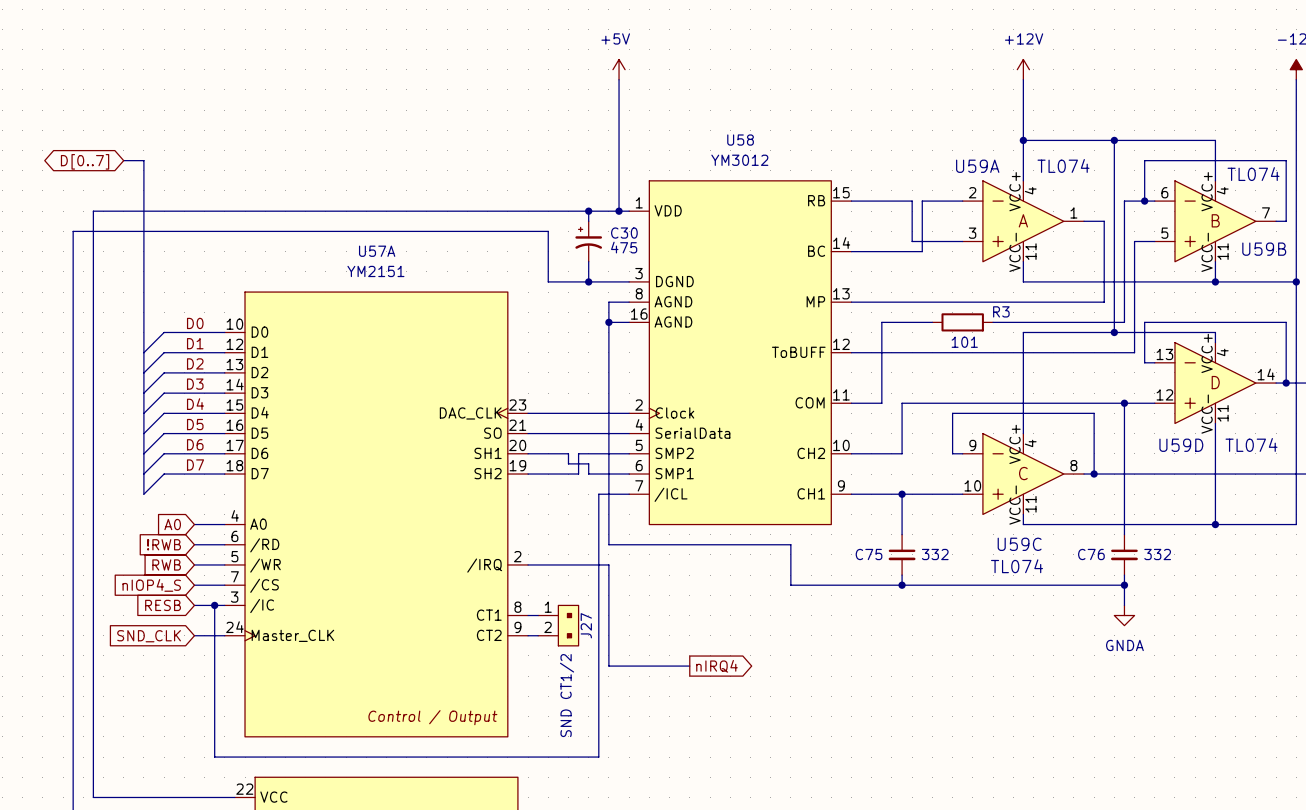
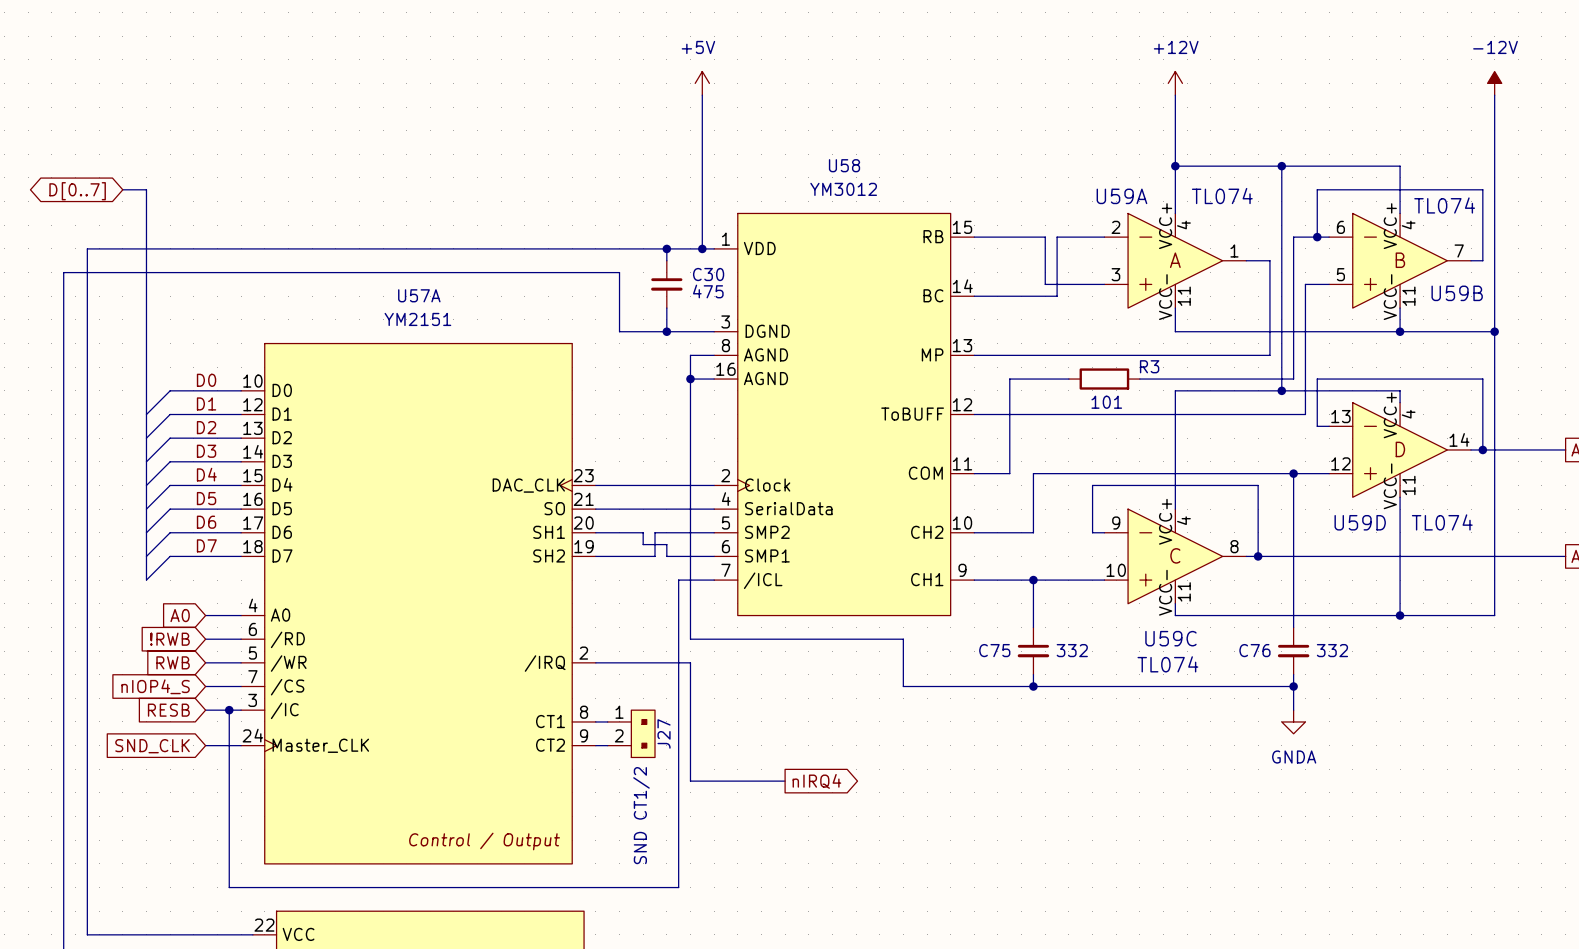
C30 symbol: [575, 221, 603, 262] -> [651, 260, 683, 309]

